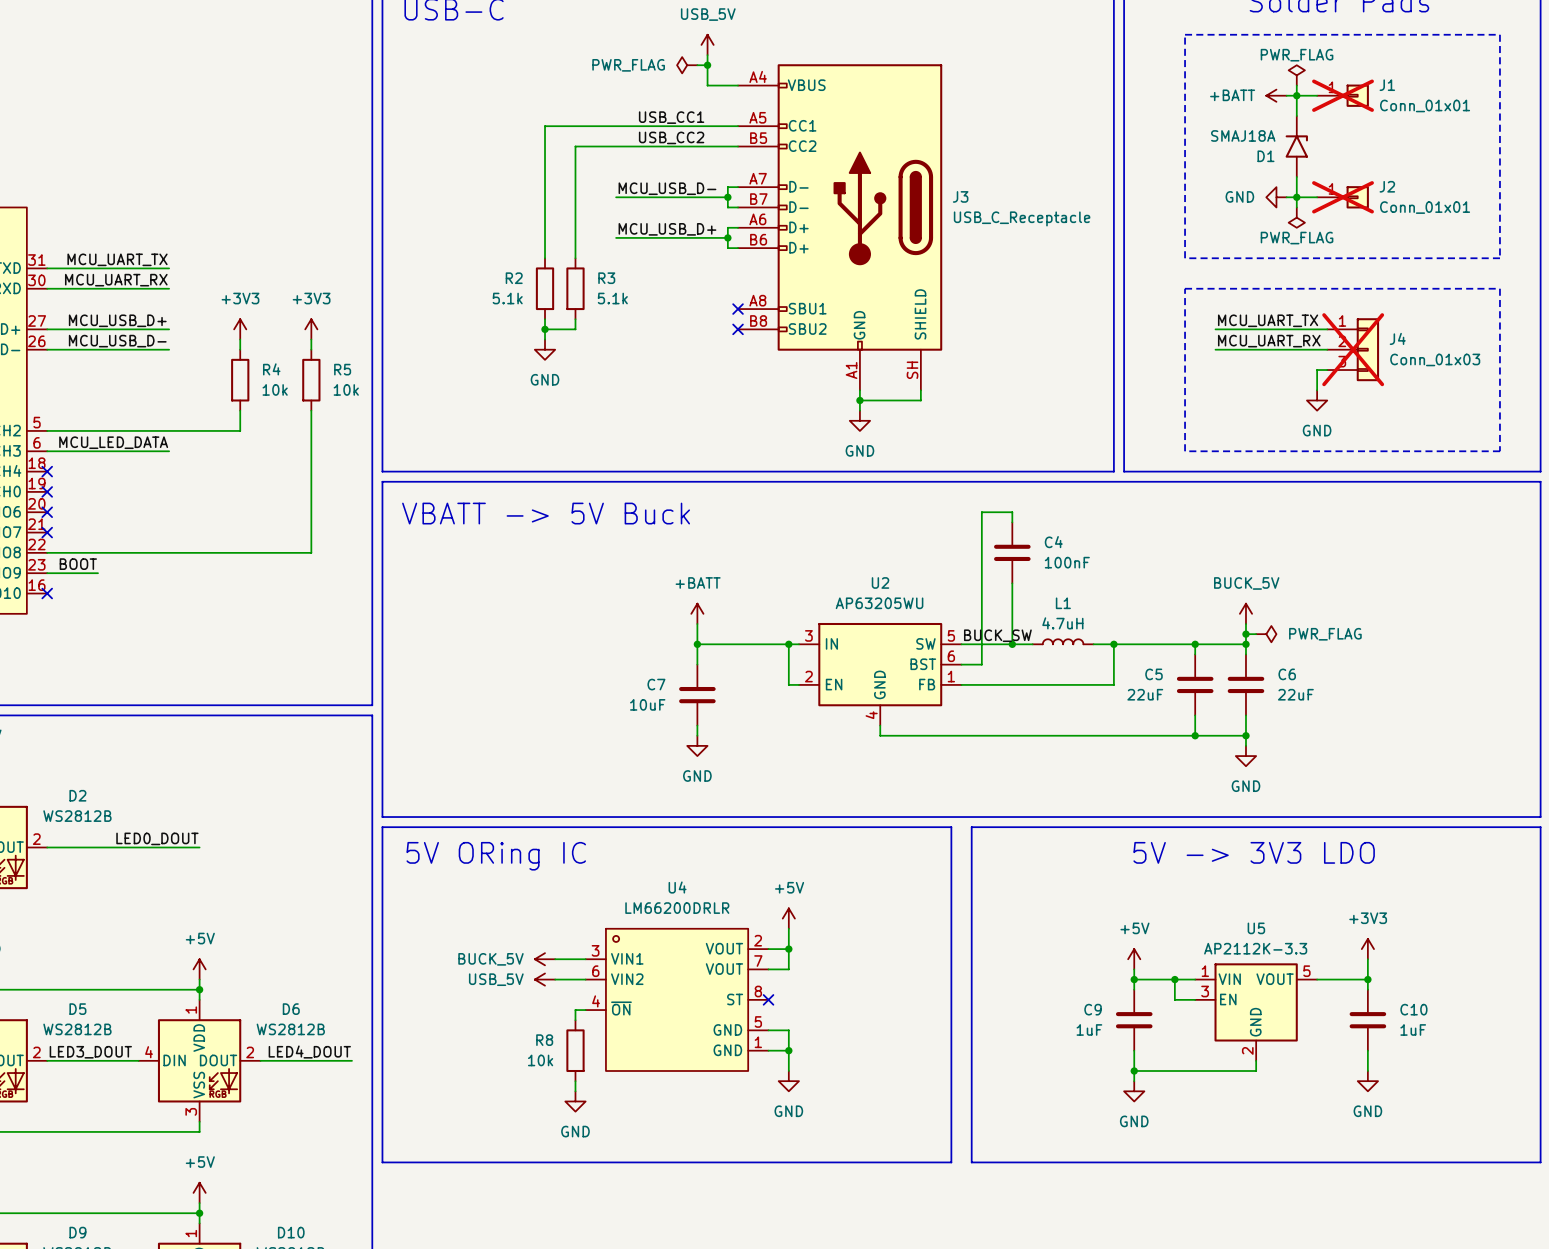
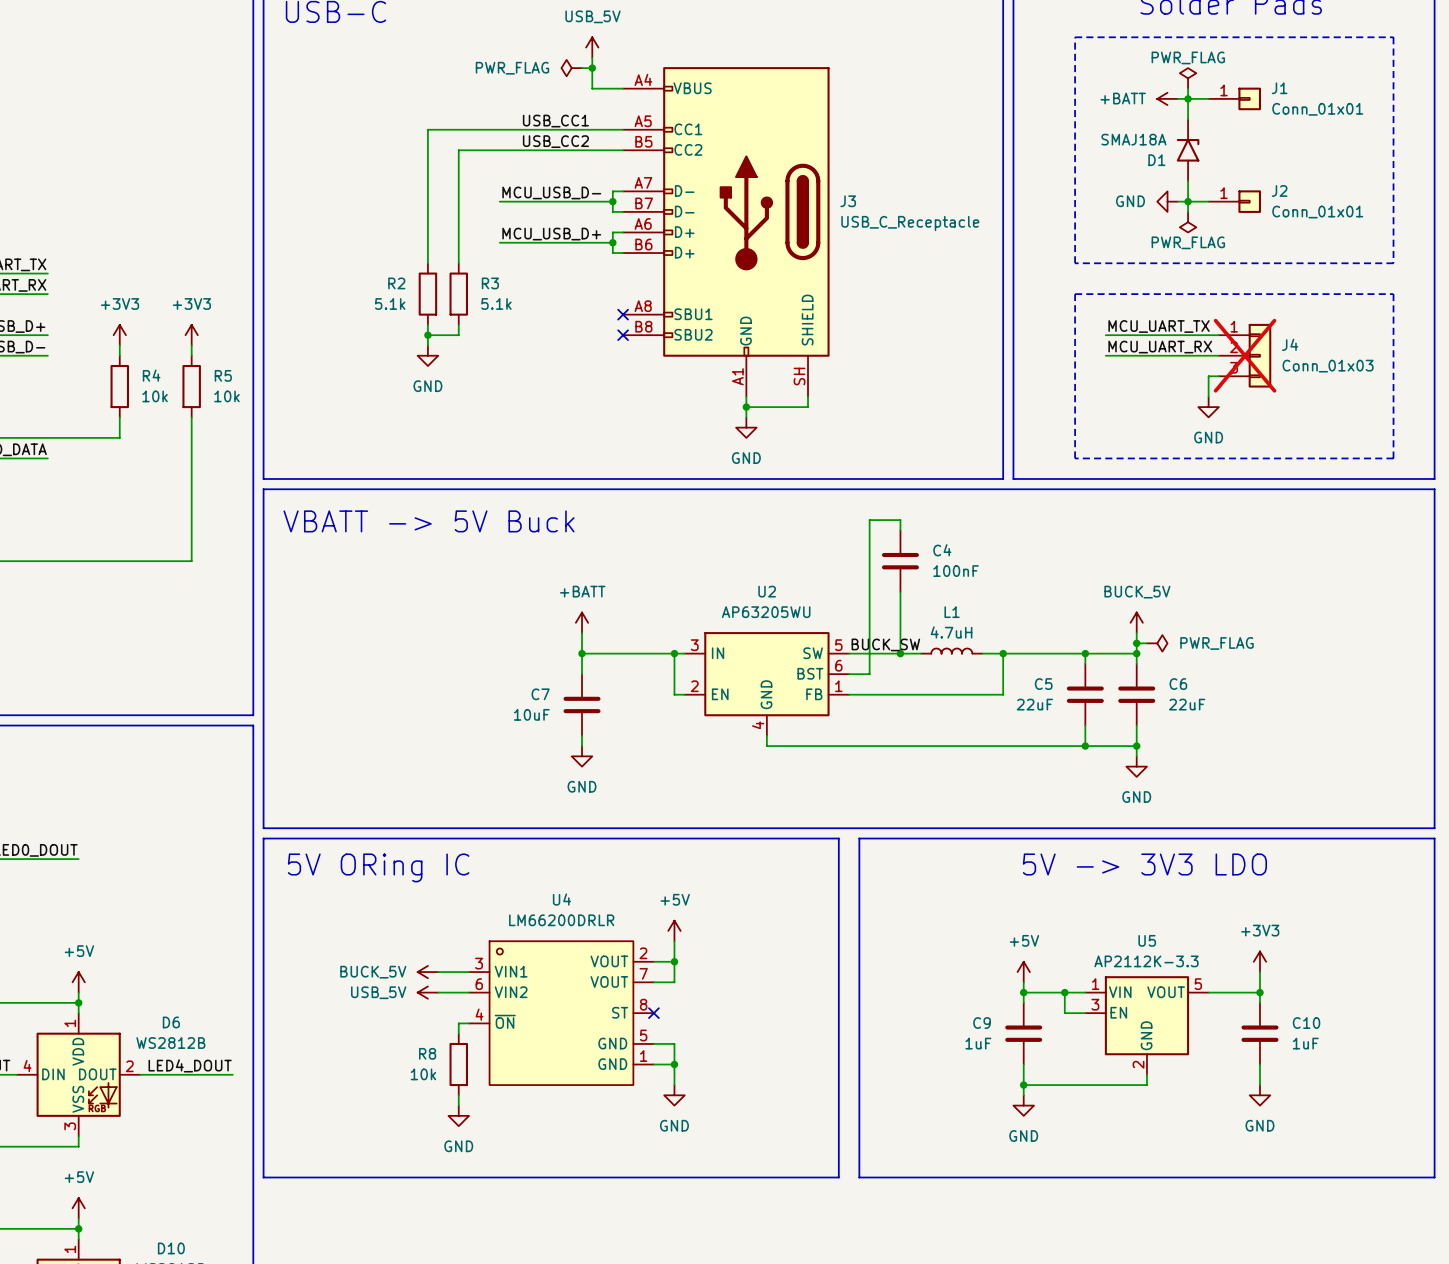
J1 do-not-place cross: (1343, 95) -> none
J2 do-not-place cross: (1343, 197) -> none

